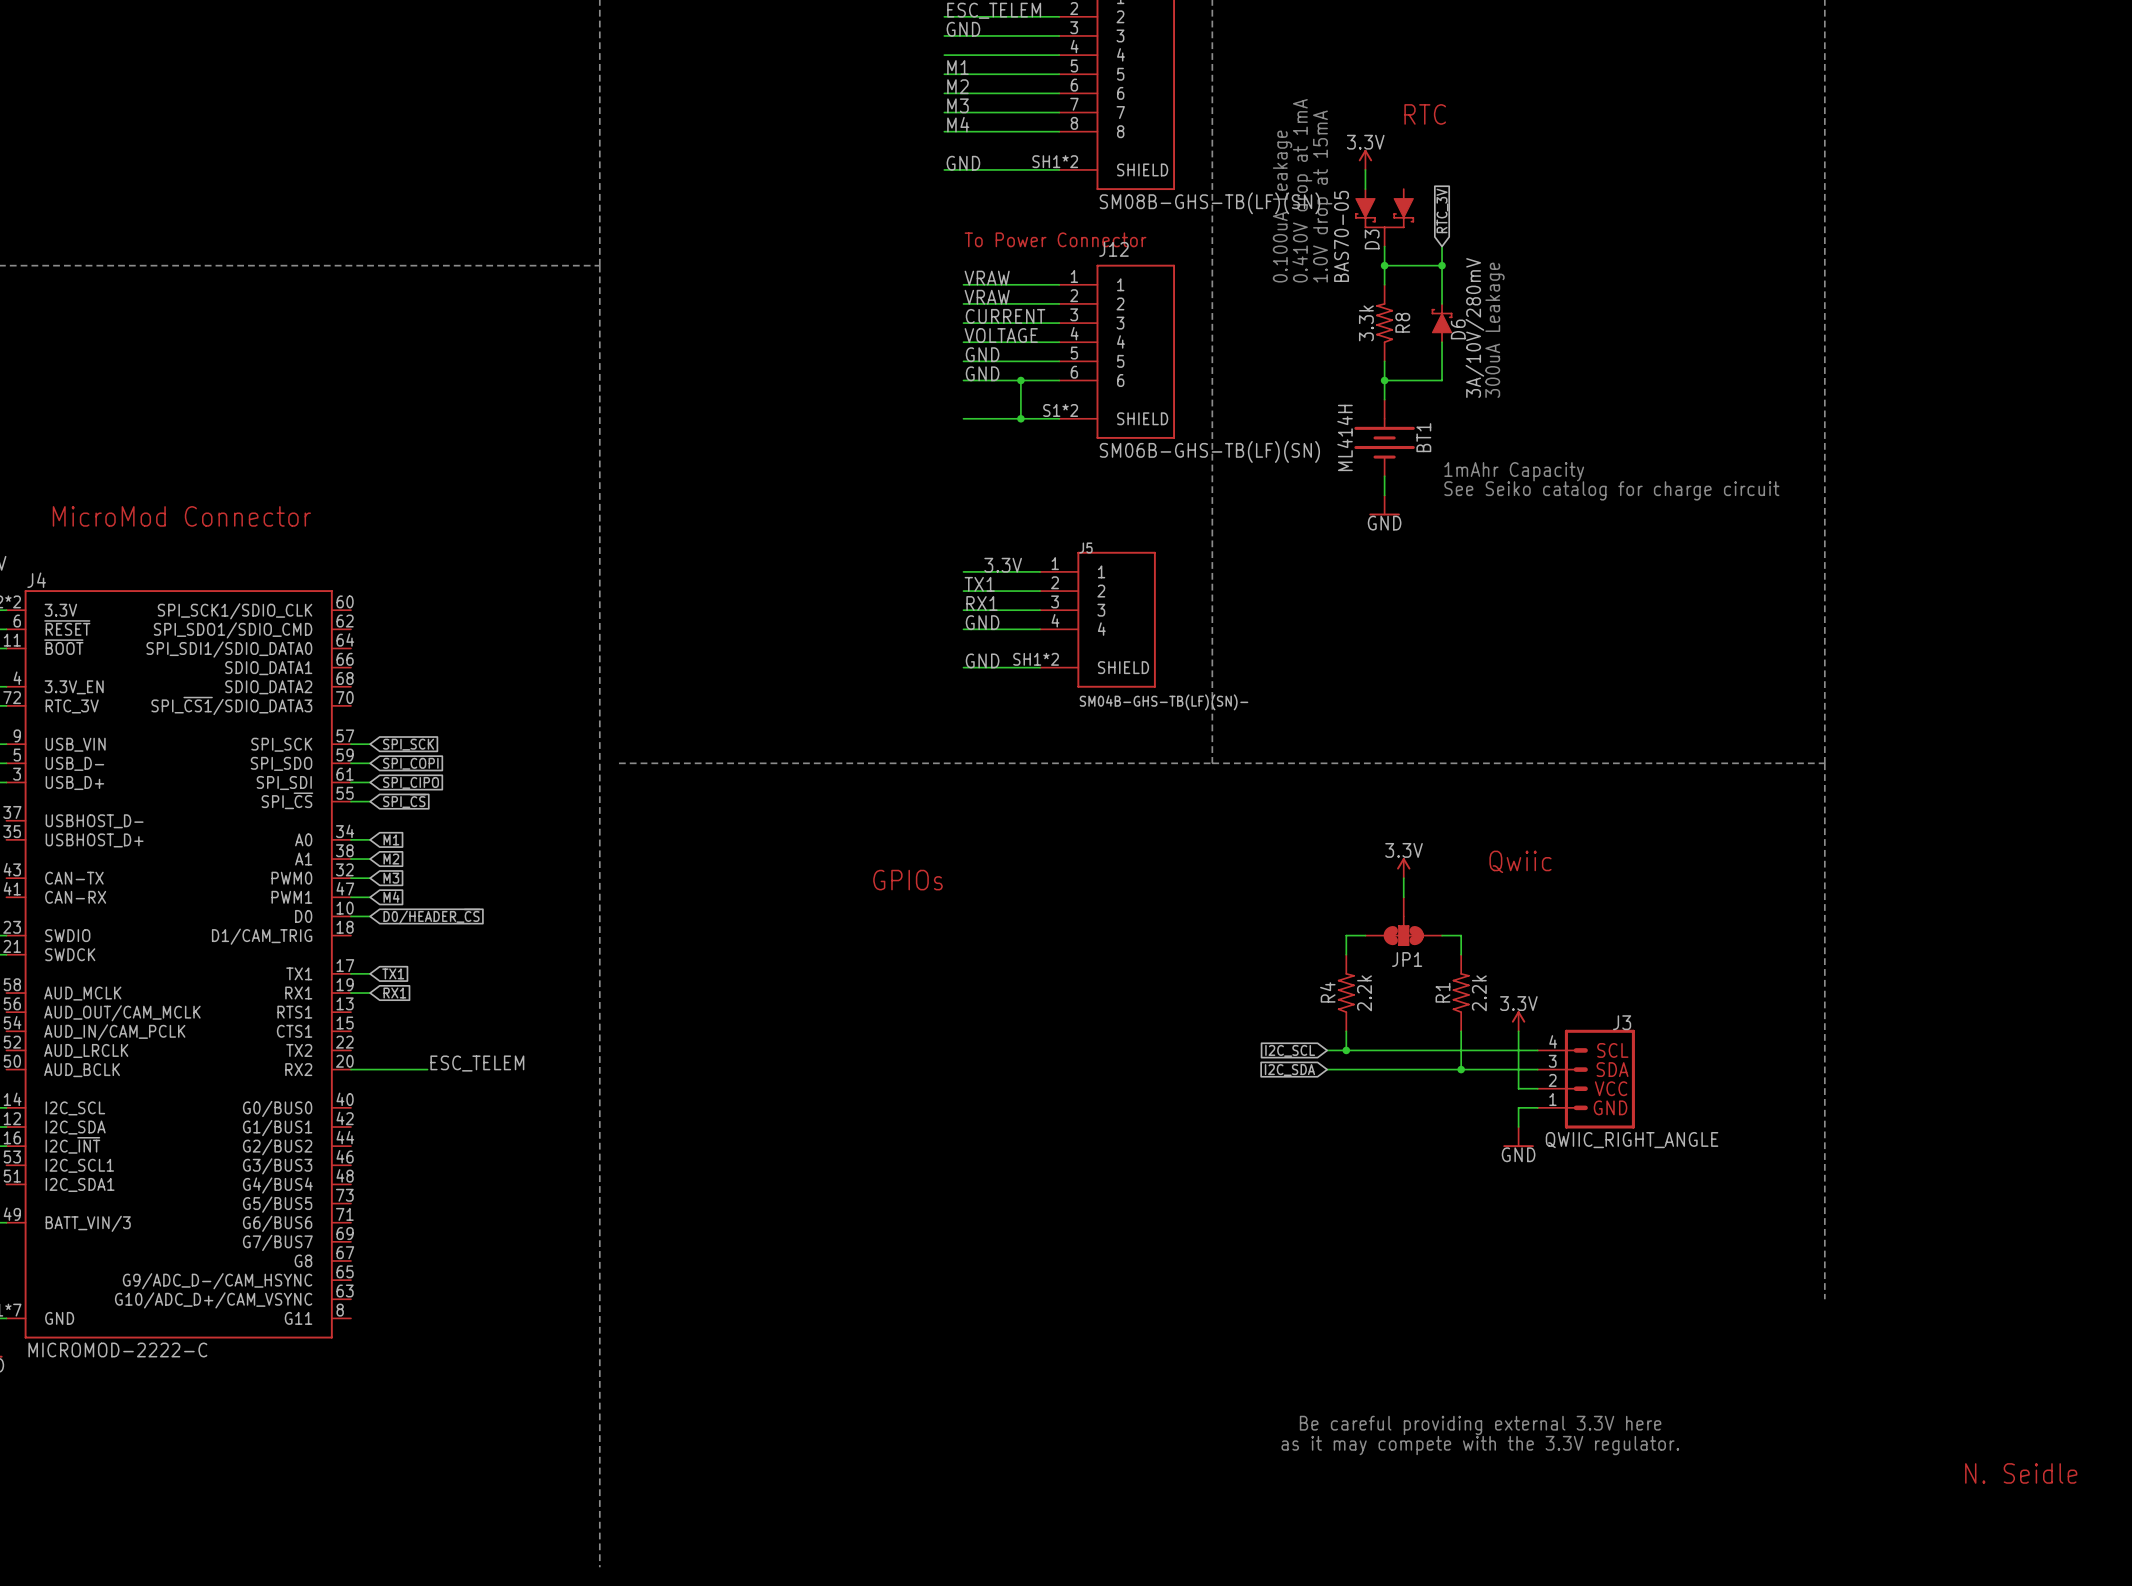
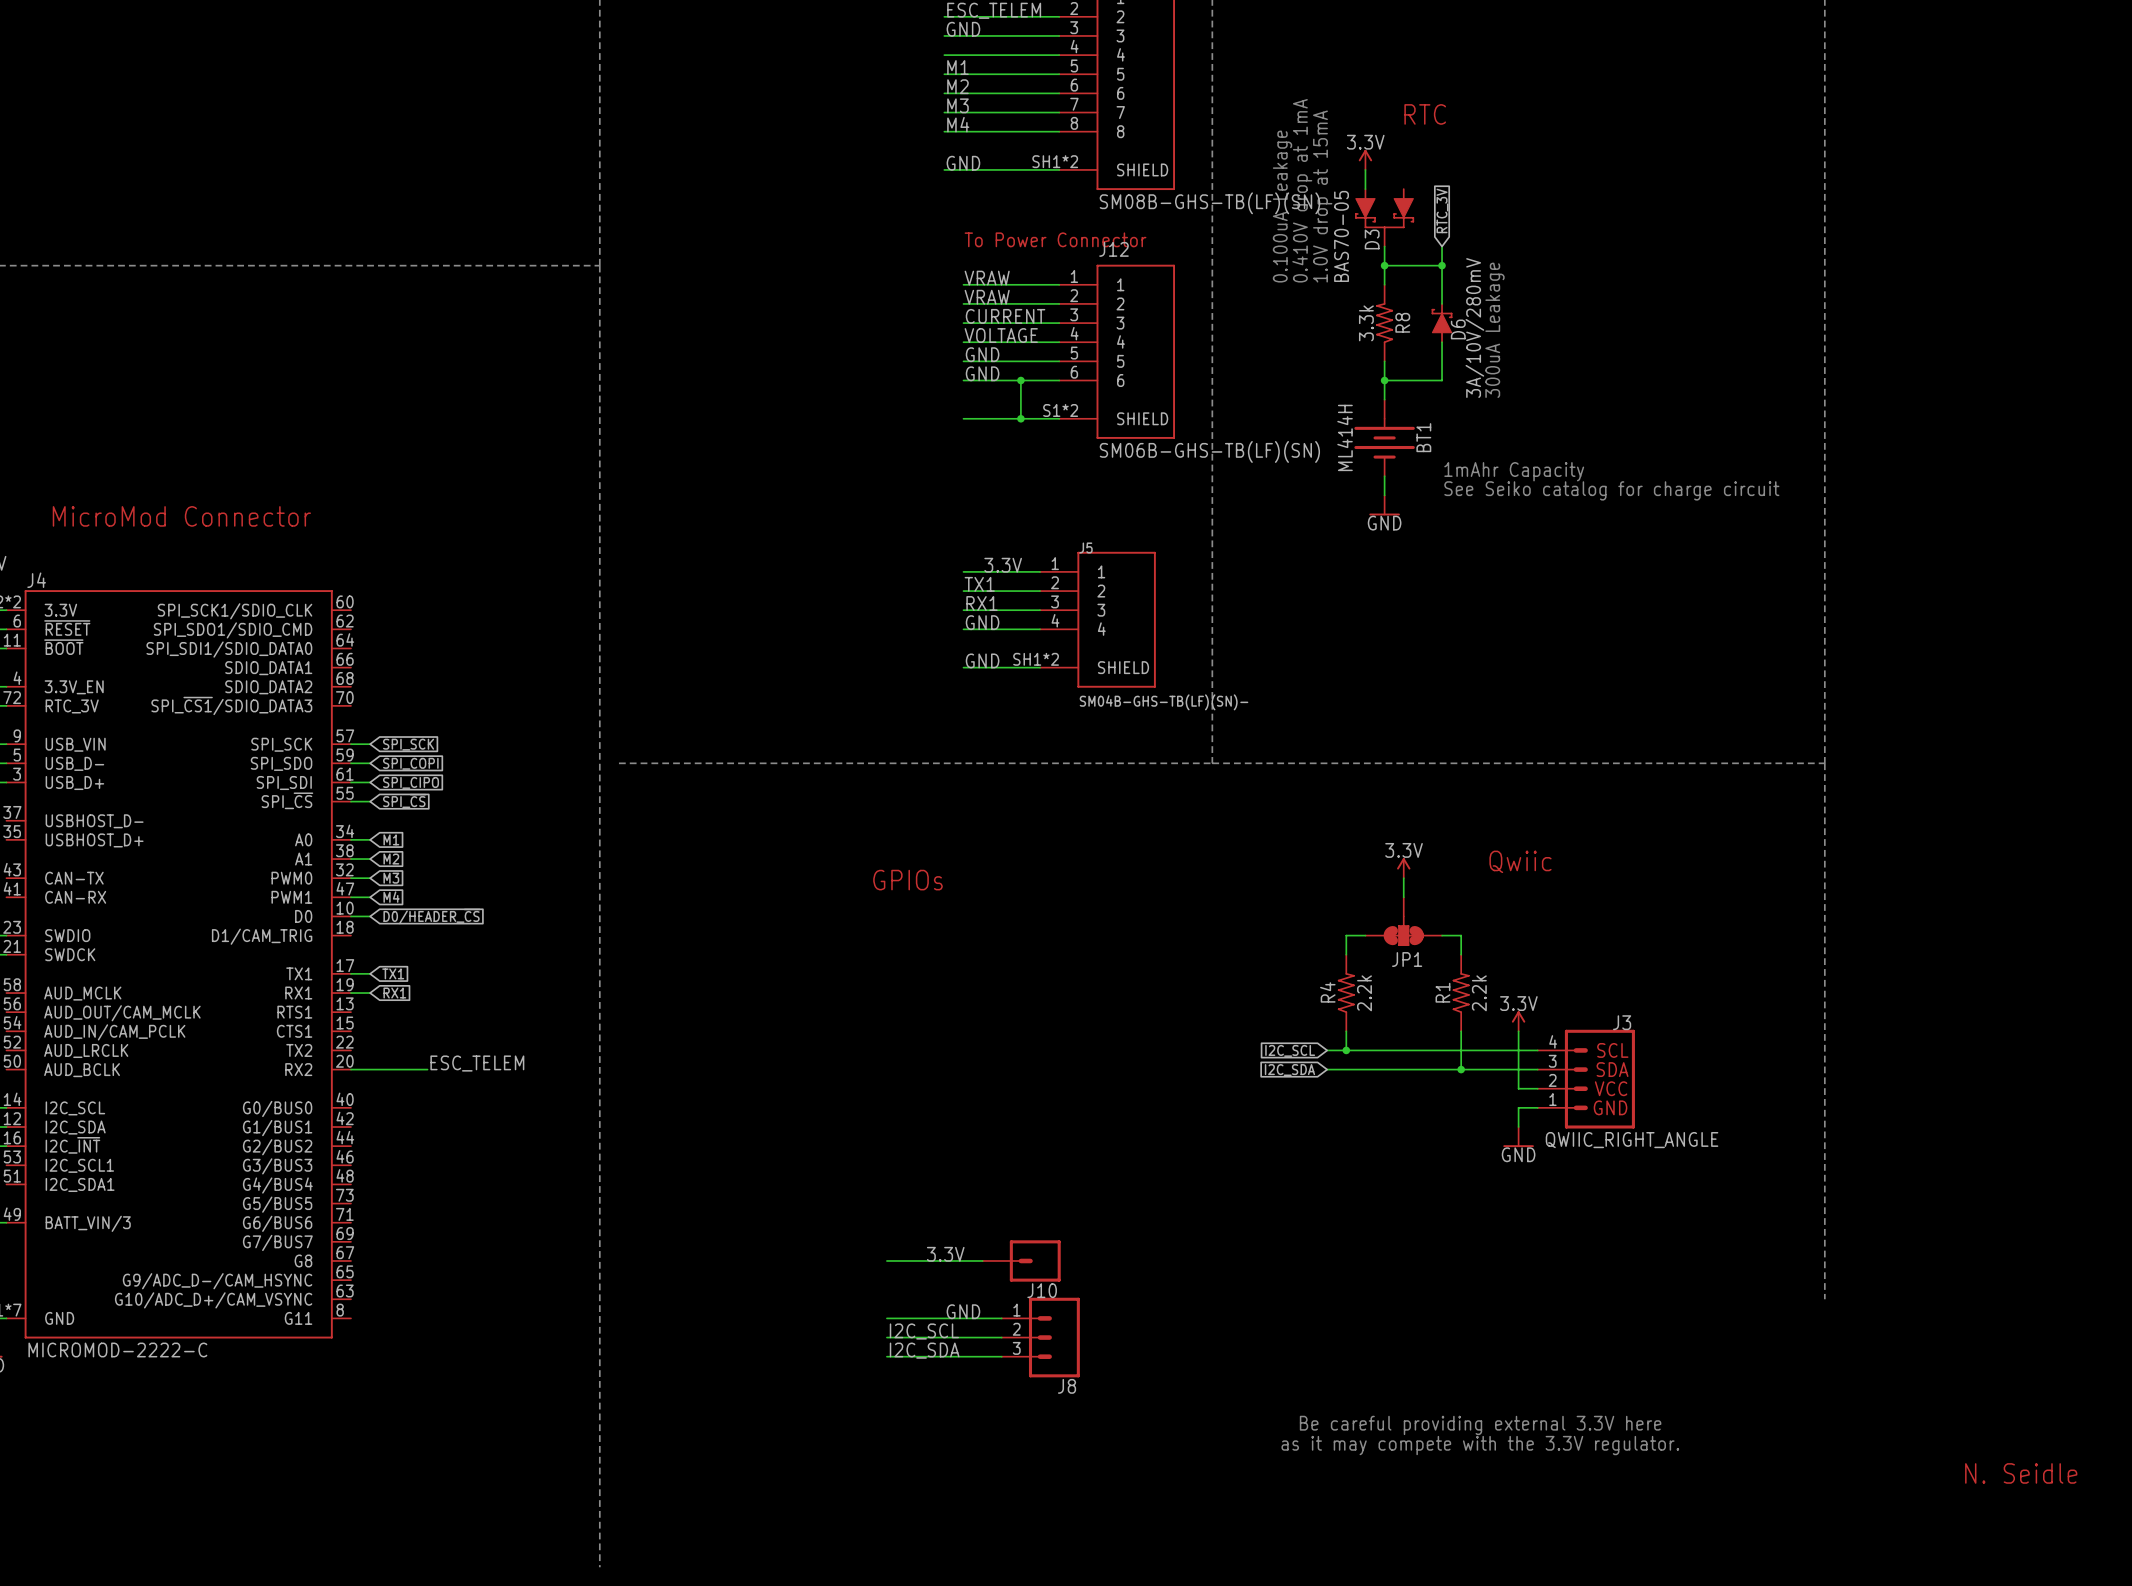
label: none -> 3.3V (945, 1254)
wire: none -> (886, 1260) (982, 1260)
J10: none -> (1021, 1260)
label: none -> GND (963, 1311)
wire: none -> (886, 1318) (1001, 1318)
label: none -> I2C_SCL (924, 1331)
wire: none -> (886, 1337) (1001, 1337)
J8: none -> (1040, 1337)
label: none -> I2C_SDA (924, 1350)
wire: none -> (886, 1356) (1001, 1356)

